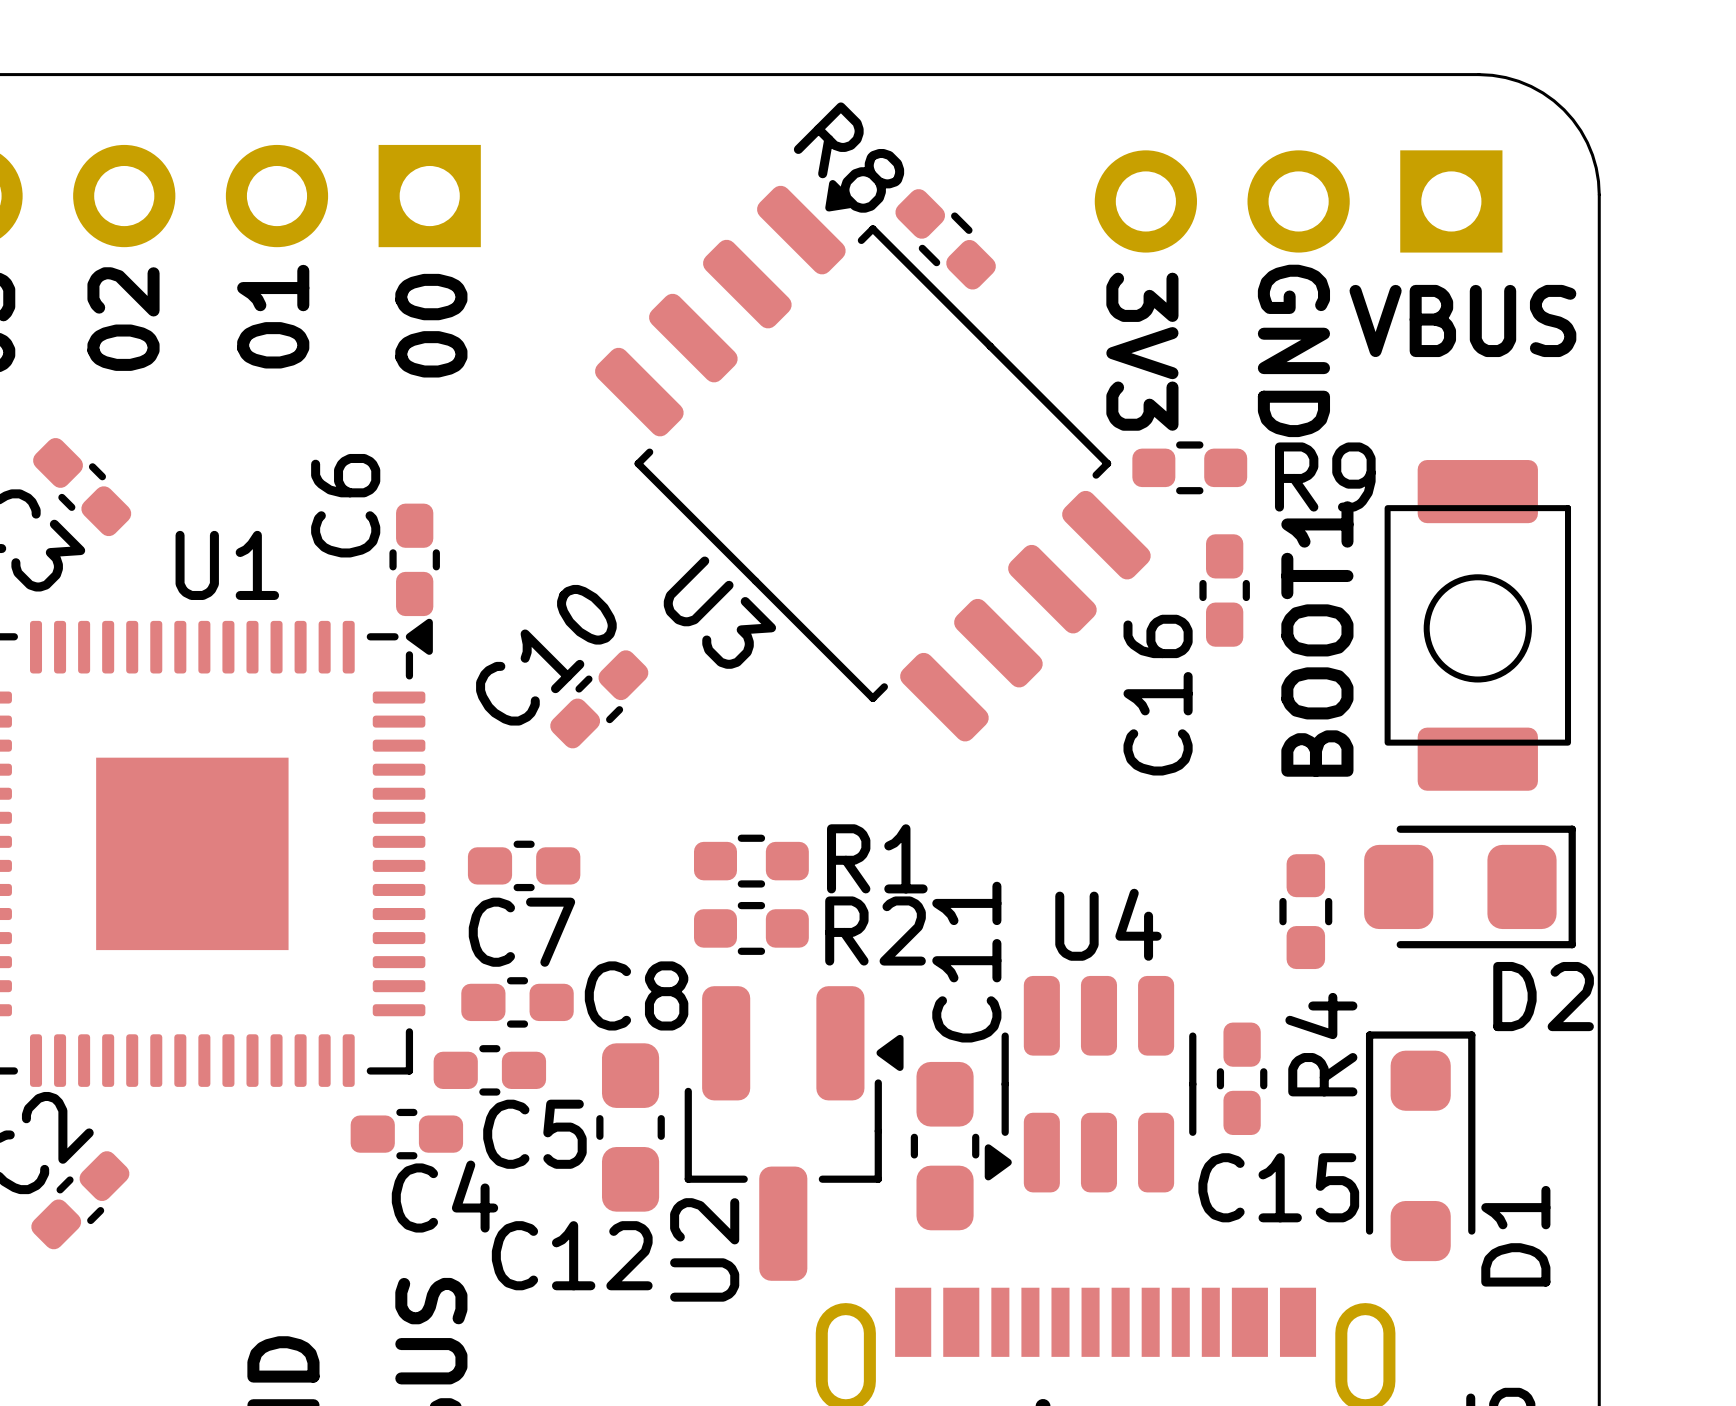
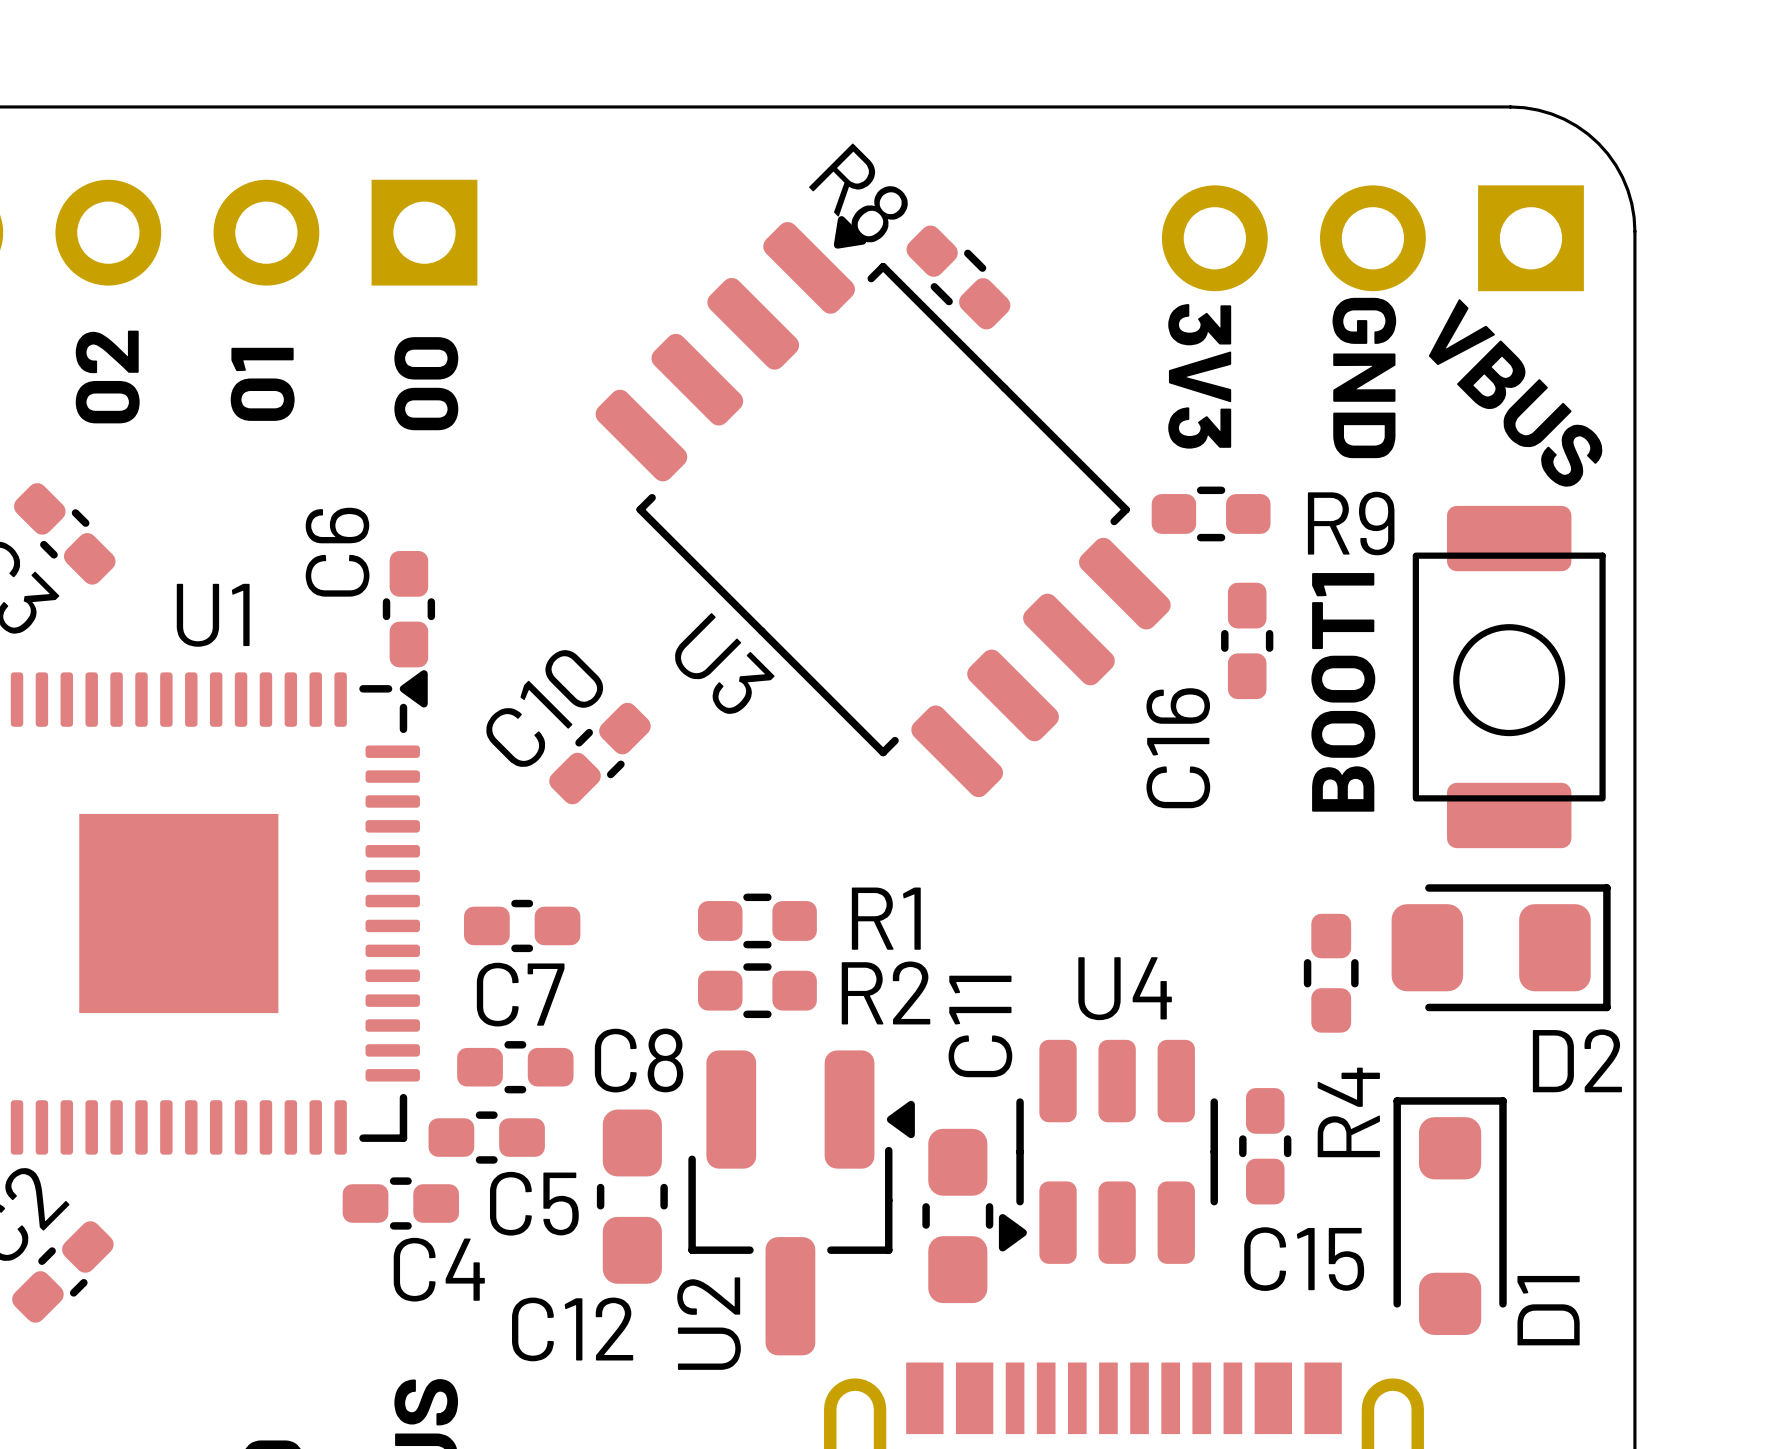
part position: (1298, 201) -> (1372, 238)
text rotation: 0° (1462, 320) -> 45° clockwise (1515, 393)
text position: GND (1293, 350) -> GND (1364, 377)
text position: 3V3 (1142, 351) -> 3V3 (1199, 376)

